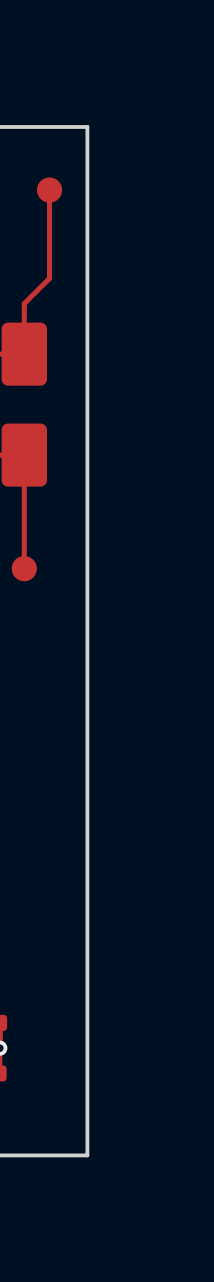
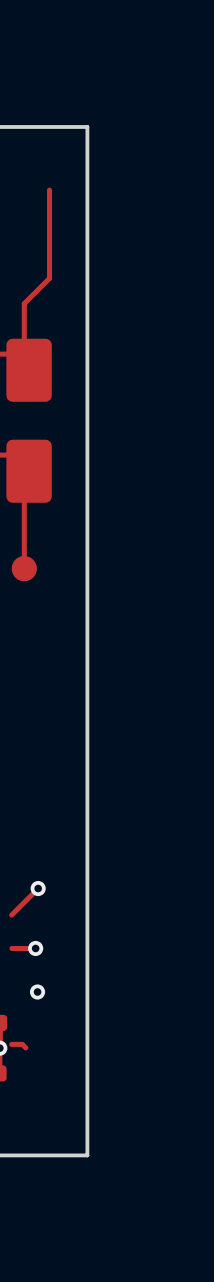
part: (49, 190) -> none
part position: (24, 404) -> (29, 420)
top track: none -> (38, 888) (11, 915)
via: none -> (38, 888)
top track: none -> (35, 948) (11, 948)
via: none -> (35, 948)
via: none -> (37, 992)
top track: none -> (11, 1044) (22, 1044) (25, 1047)

